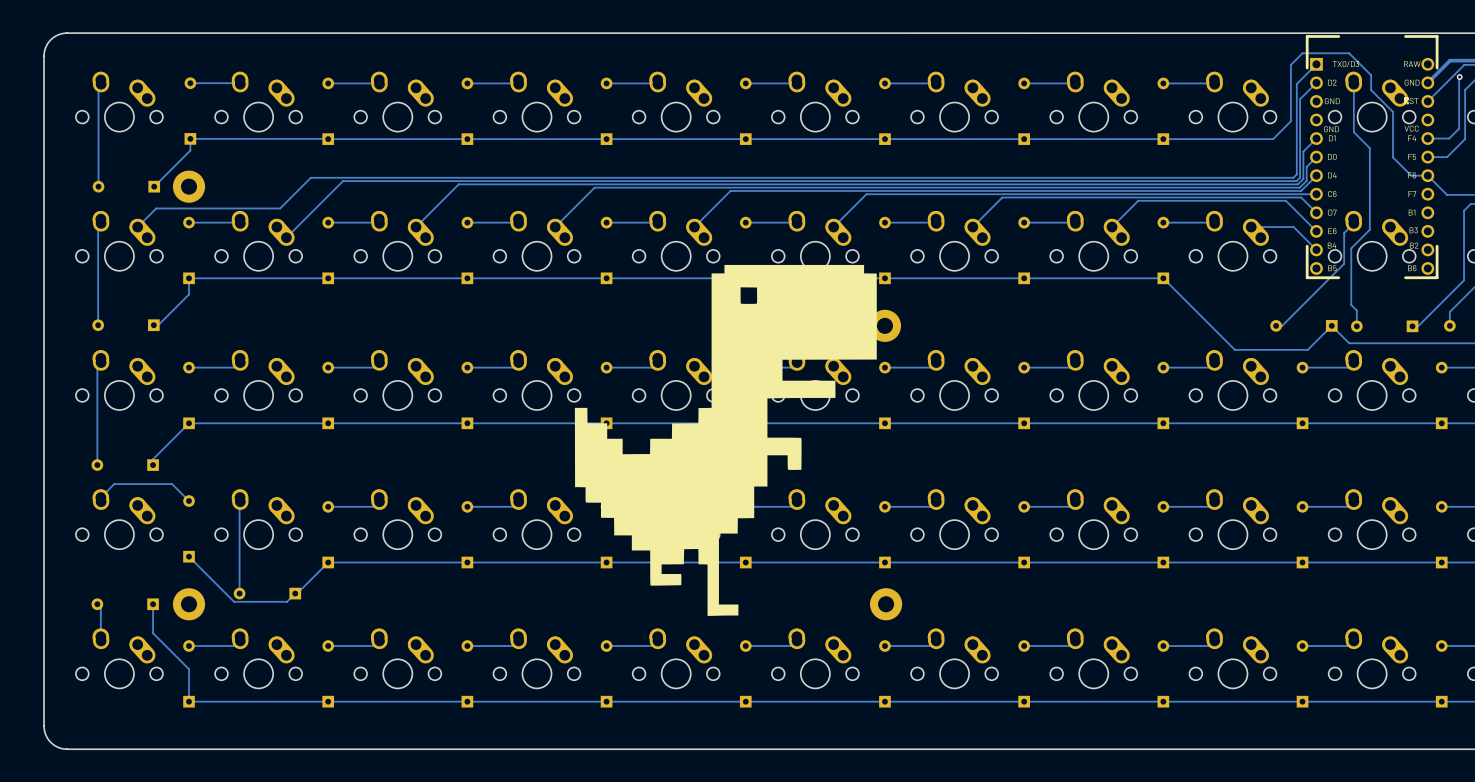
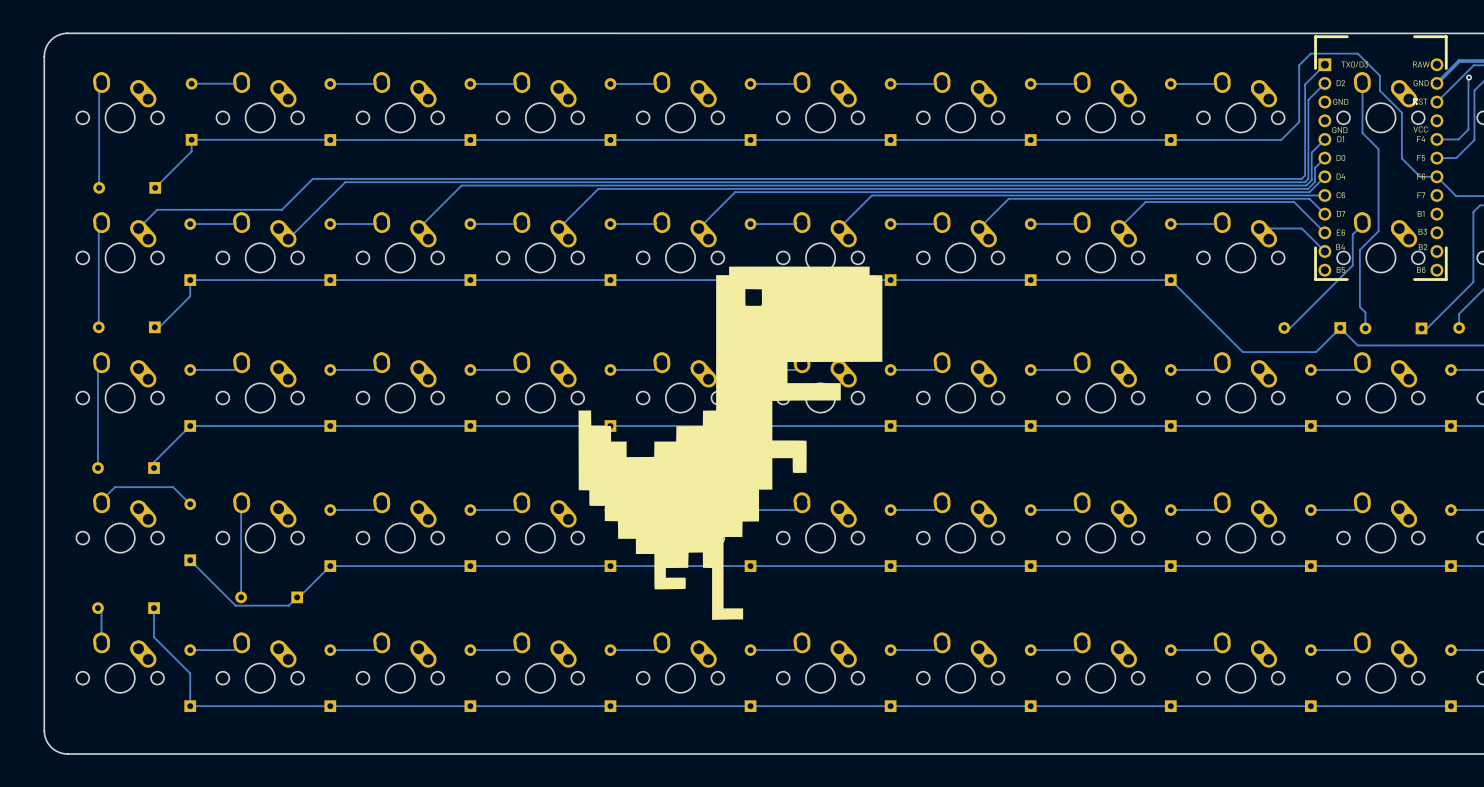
part: (189, 186) -> none
part: (884, 325) -> none
part: (189, 604) -> none
part: (886, 604) -> none

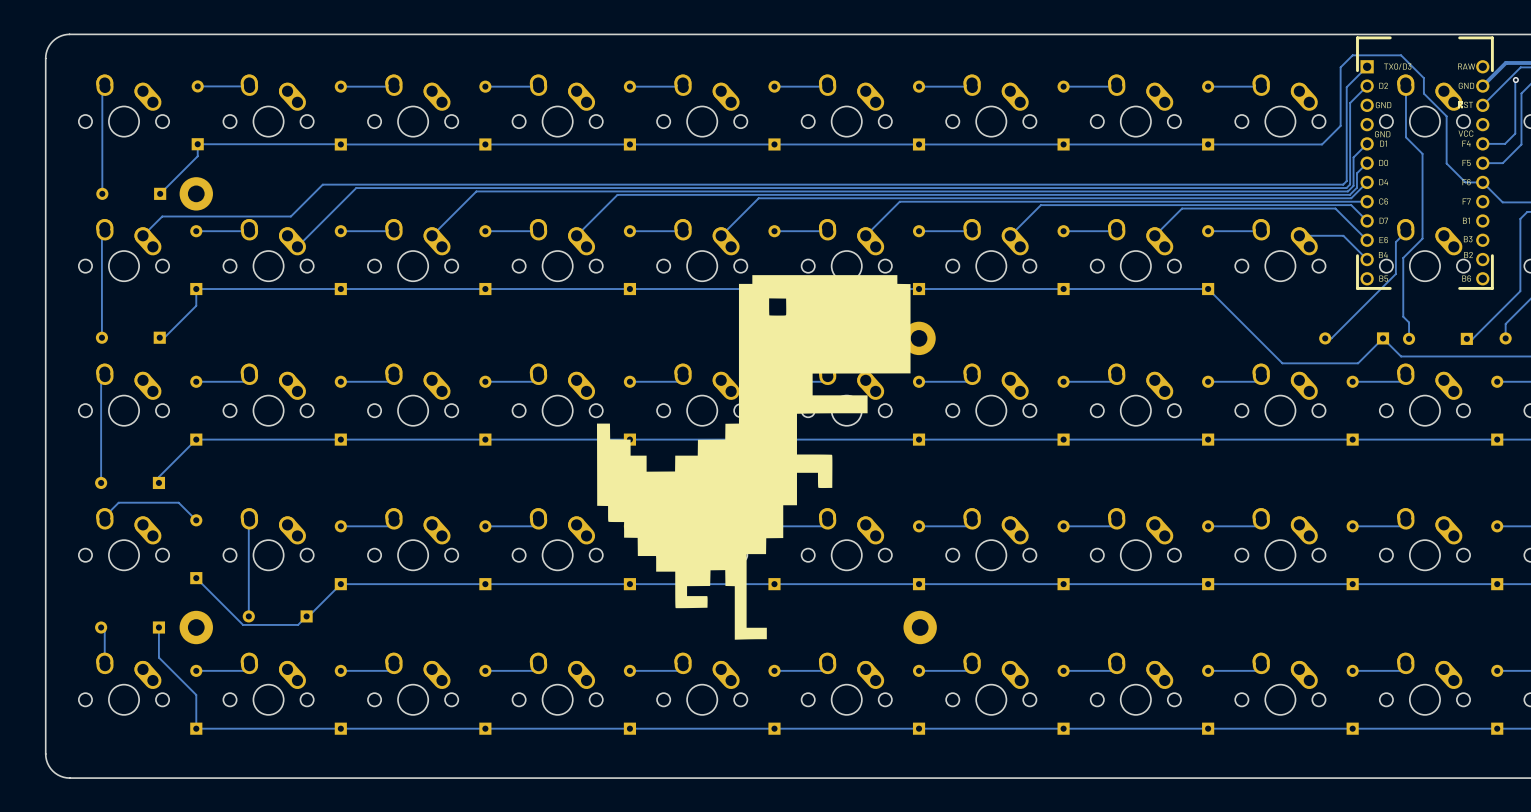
part: none -> (196, 193)
part: none -> (919, 338)
part: none -> (196, 627)
part: none -> (920, 627)

